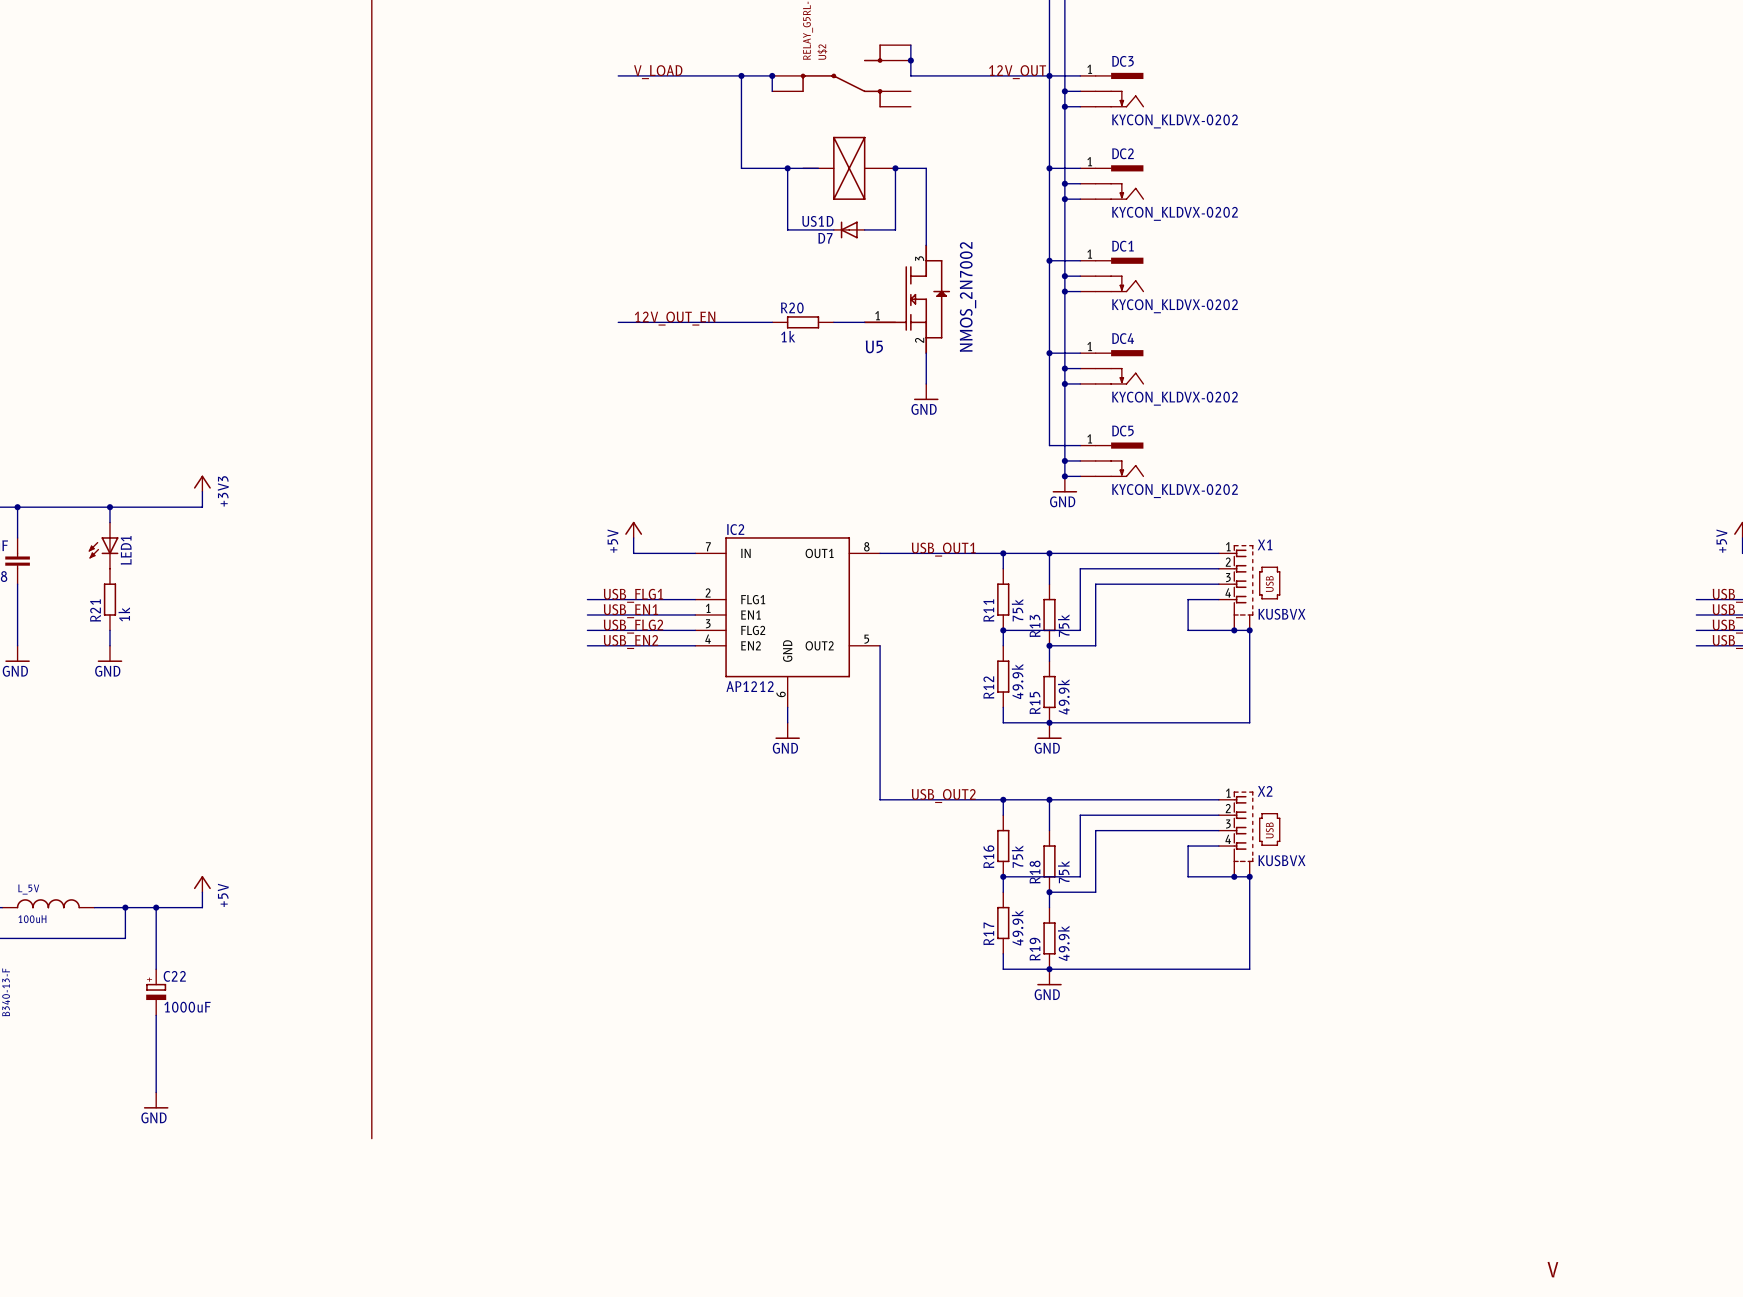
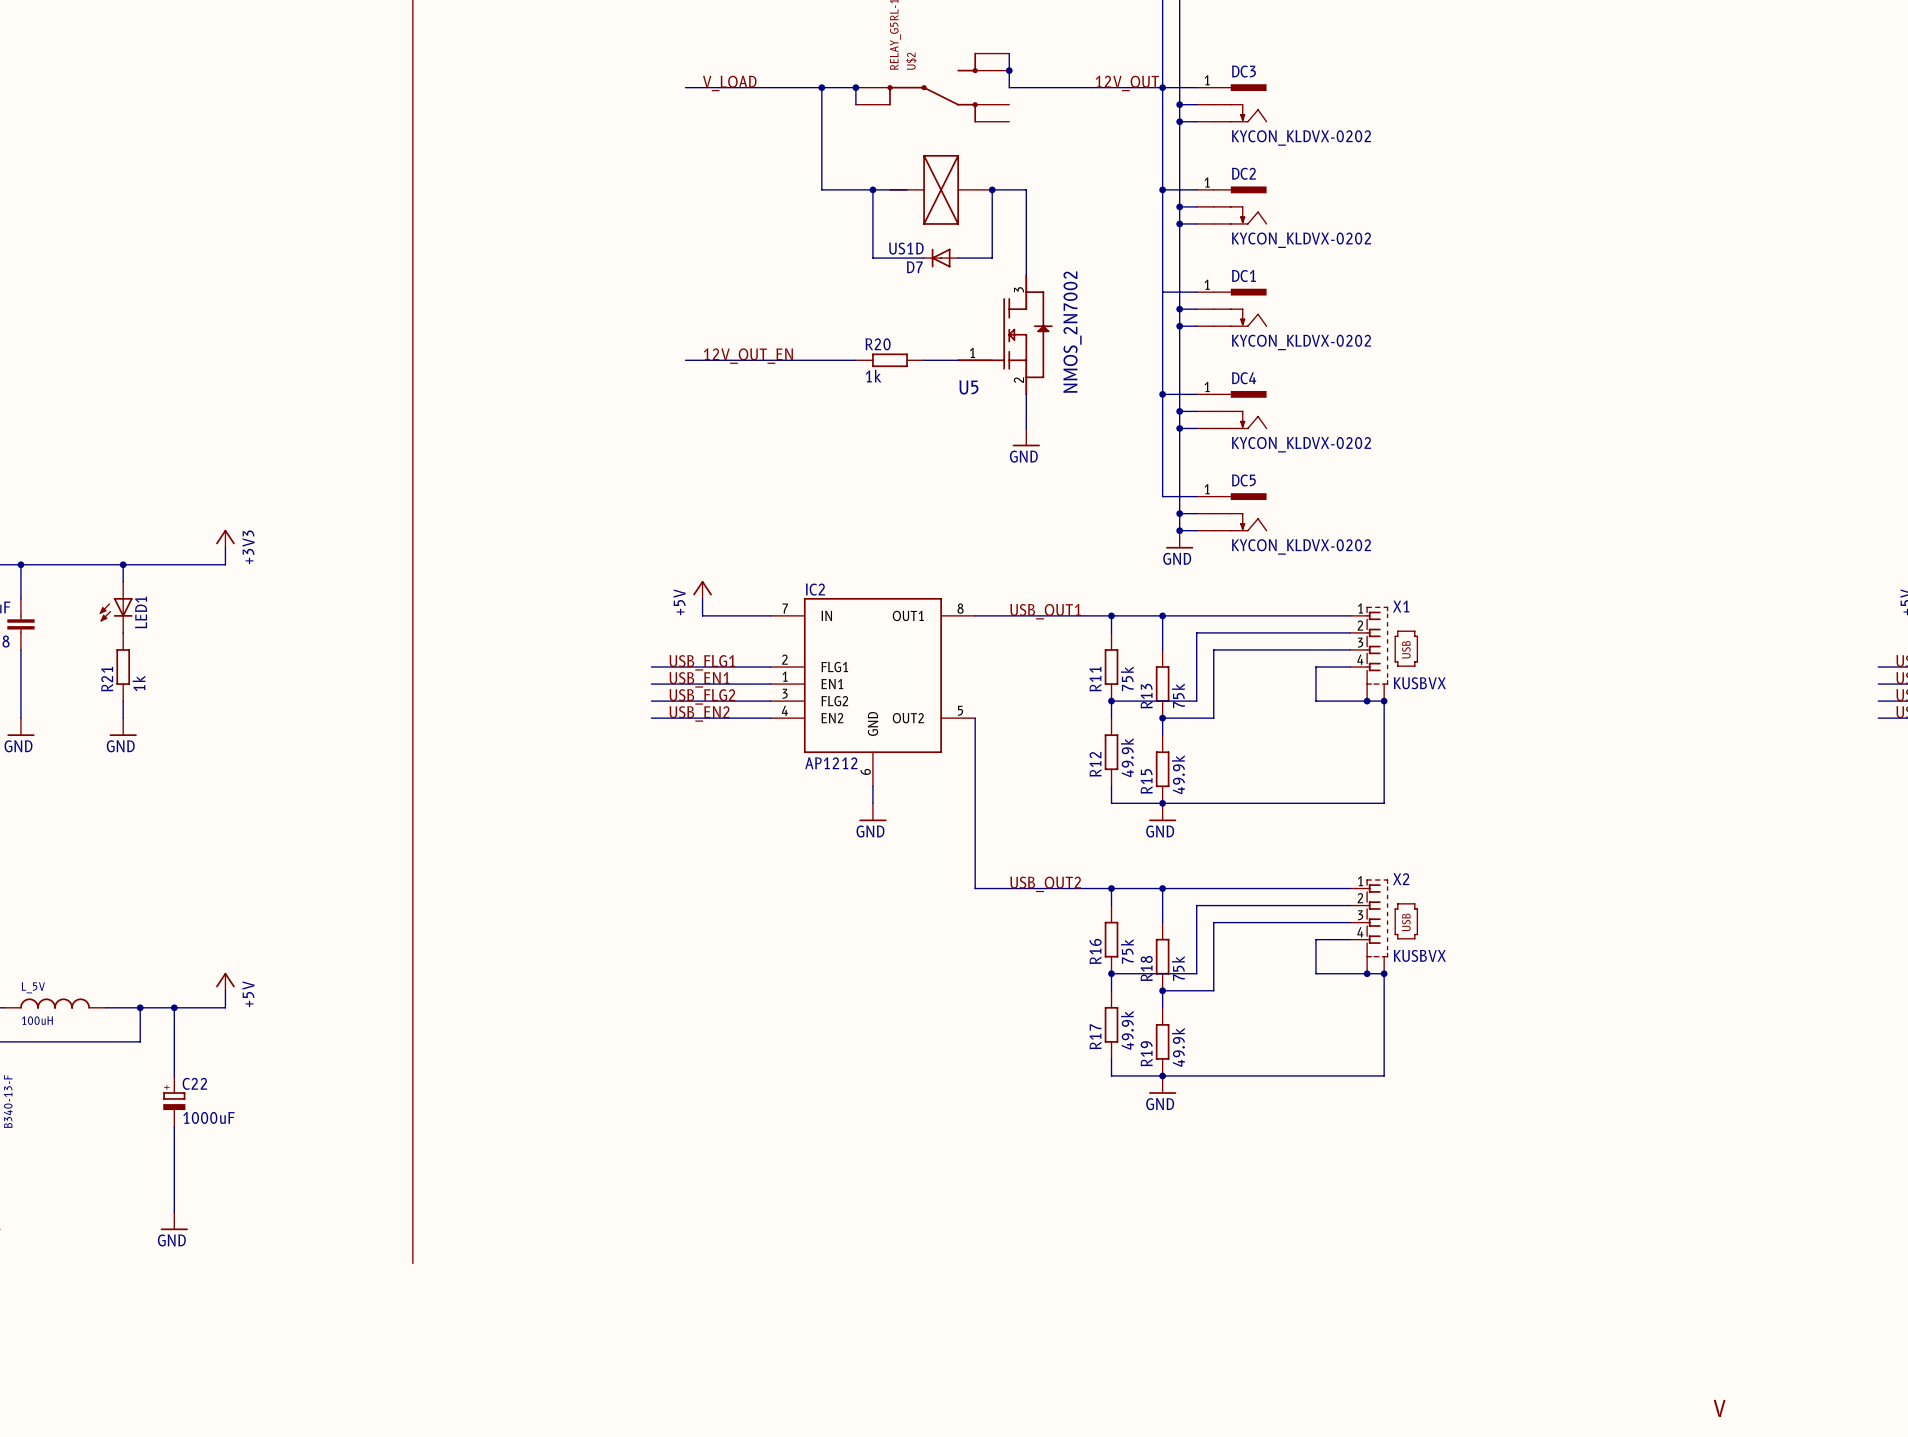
junction: (1049, 260) -> none

